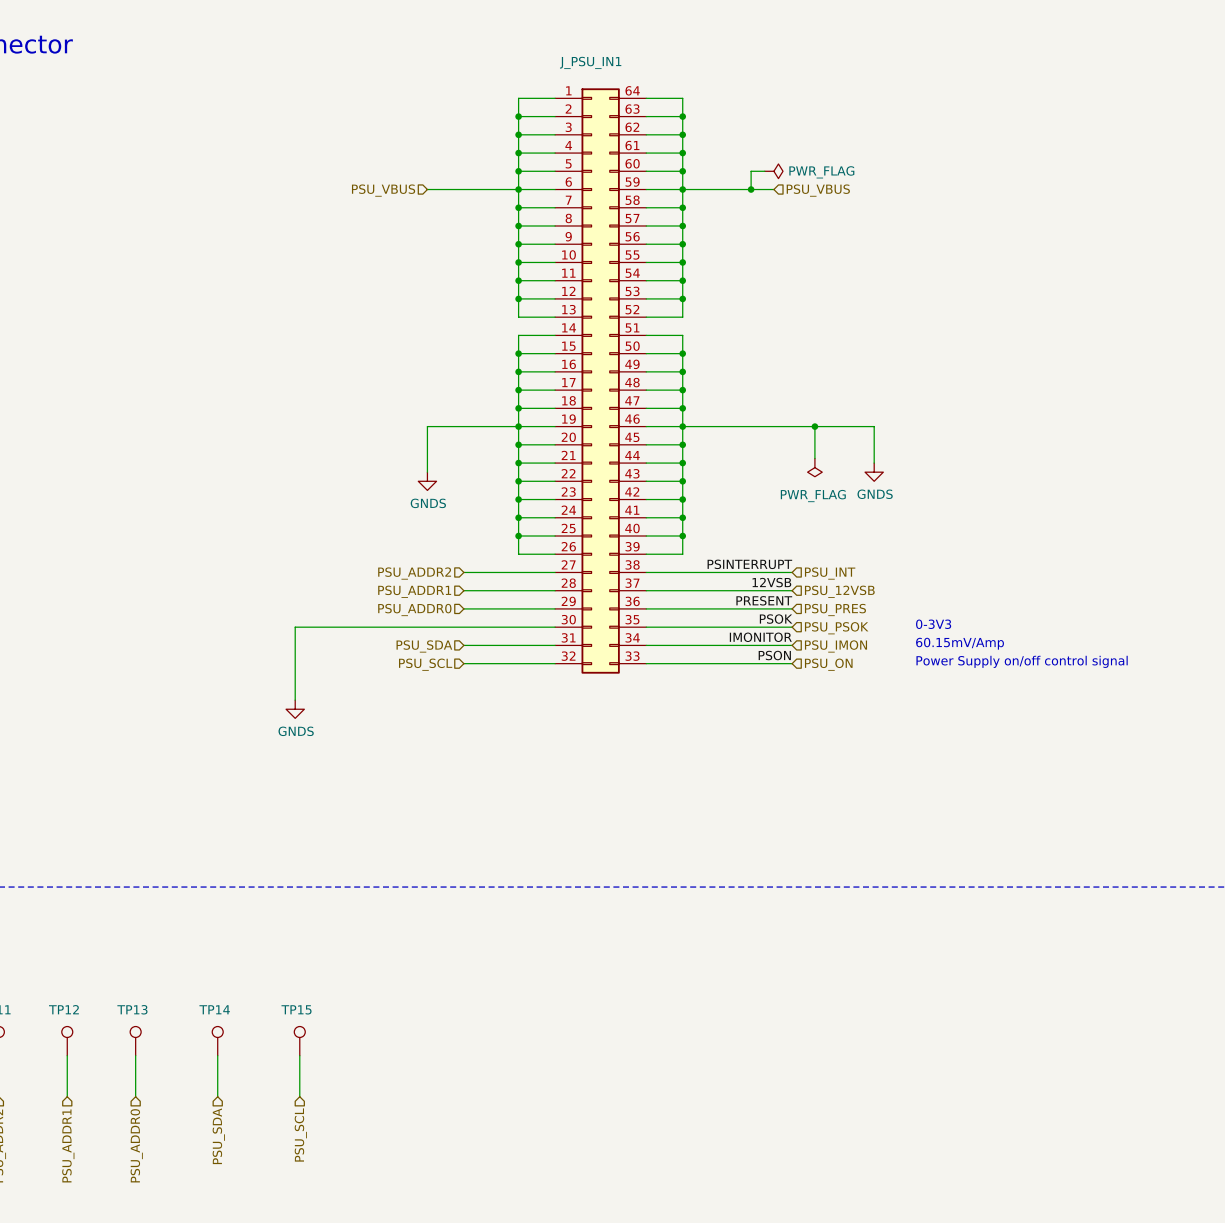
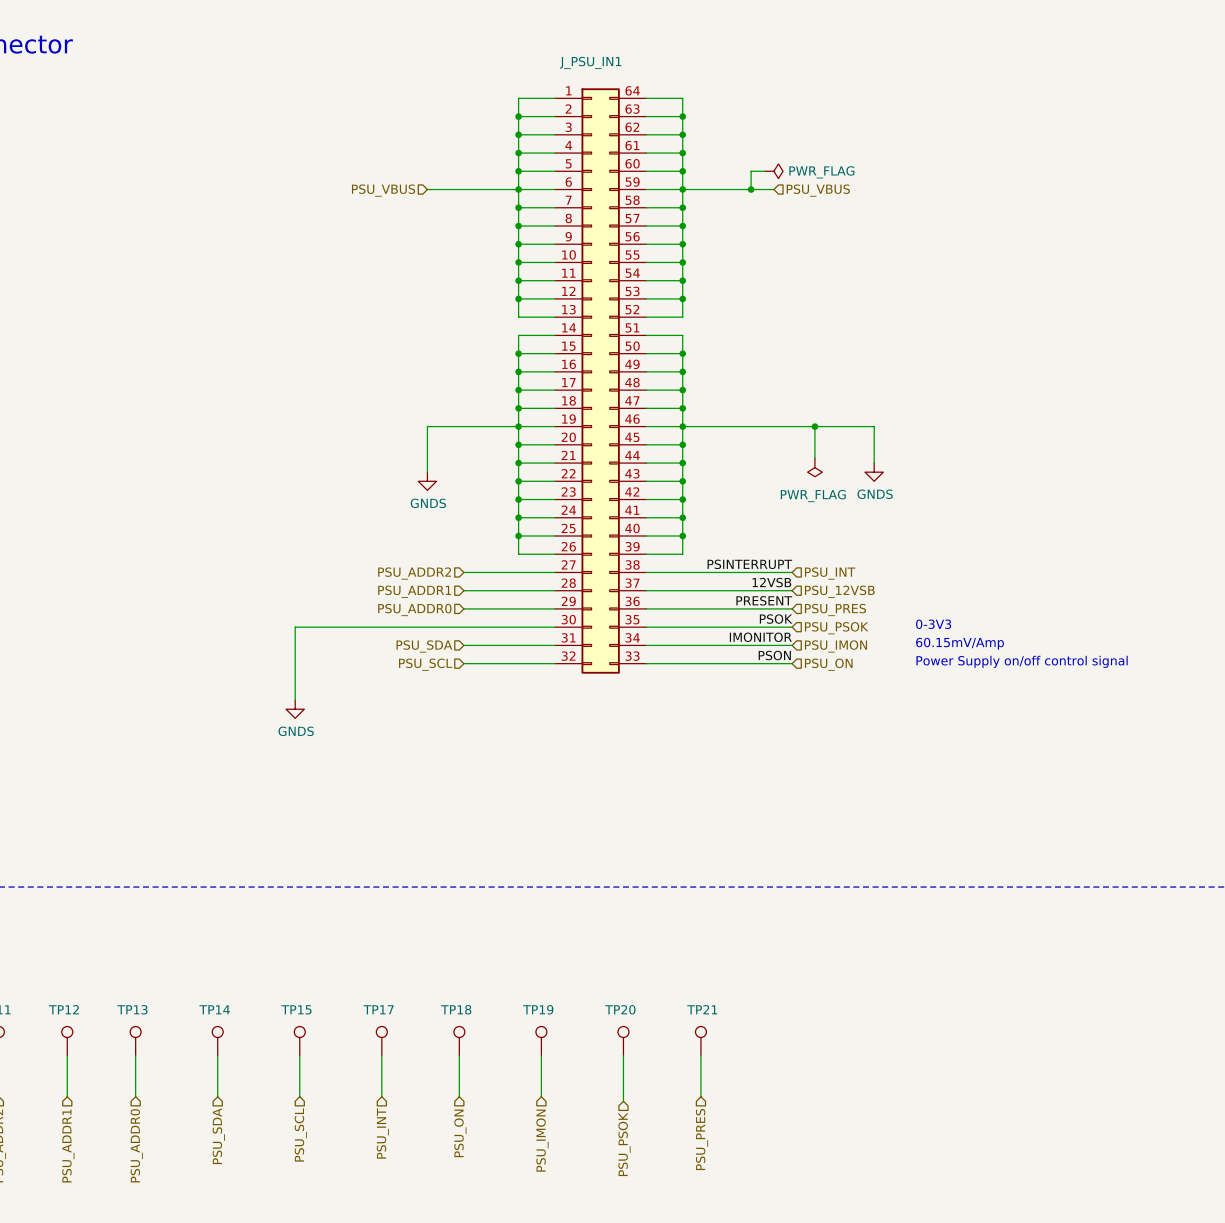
TP17: none -> (381, 1041)
TP18: none -> (459, 1041)
TP19: none -> (541, 1041)
TP20: none -> (623, 1041)
TP21: none -> (700, 1041)
wire: none -> (381, 1055) (381, 1096)
wire: none -> (459, 1055) (459, 1096)
wire: none -> (541, 1055) (541, 1096)
wire: none -> (623, 1055) (623, 1101)
wire: none -> (700, 1055) (700, 1096)
hierarchical label: none -> PSU_INT (382, 1133)
hierarchical label: none -> PSU_ON (460, 1133)
hierarchical label: none -> PSU_PRES (702, 1139)
hierarchical label: none -> PSU_IMON (542, 1140)
hierarchical label: none -> PSU_PSOK (624, 1144)

